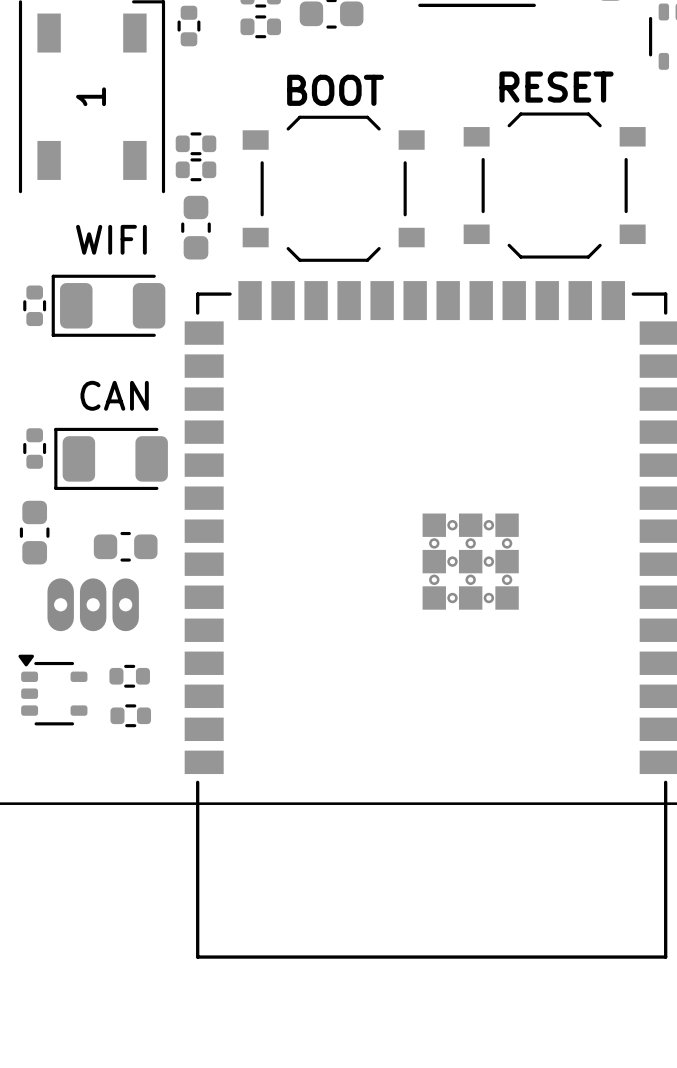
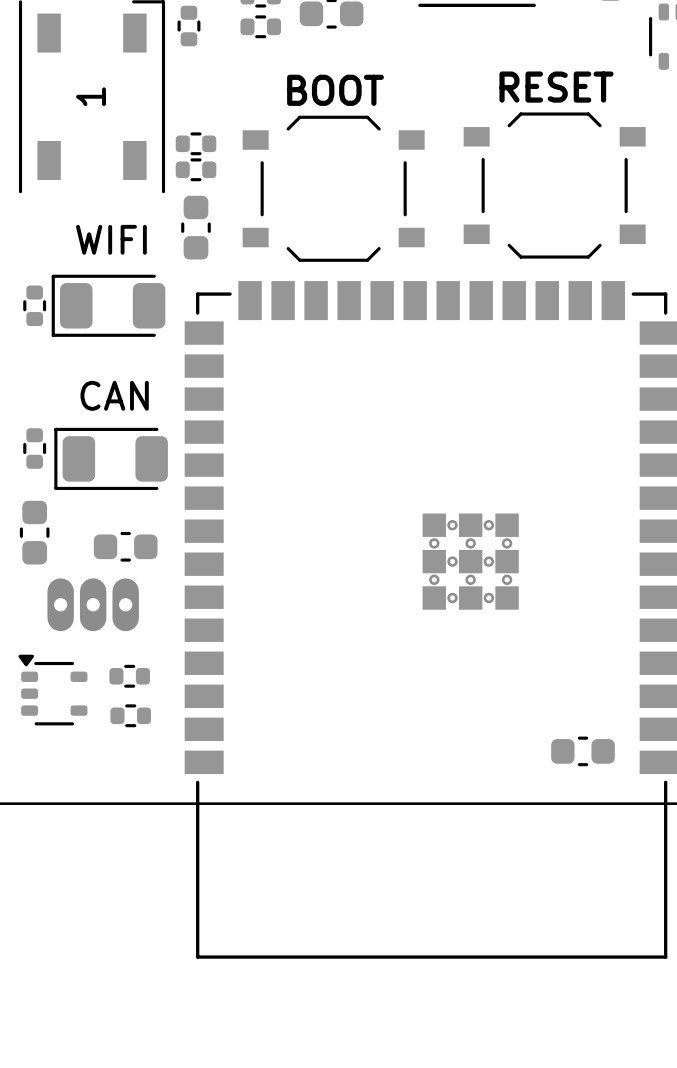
part: none -> (582, 751)

